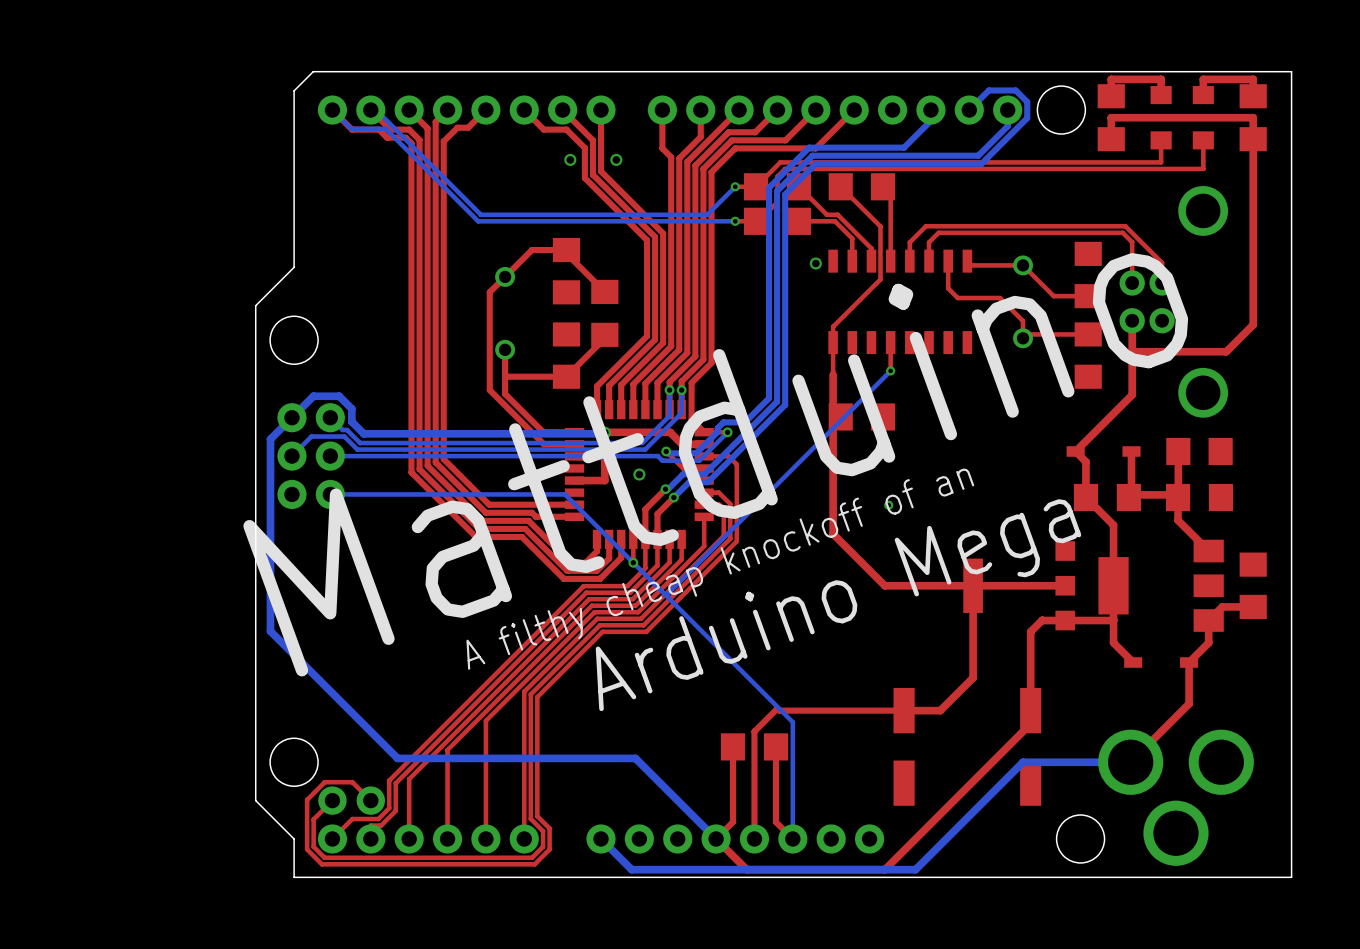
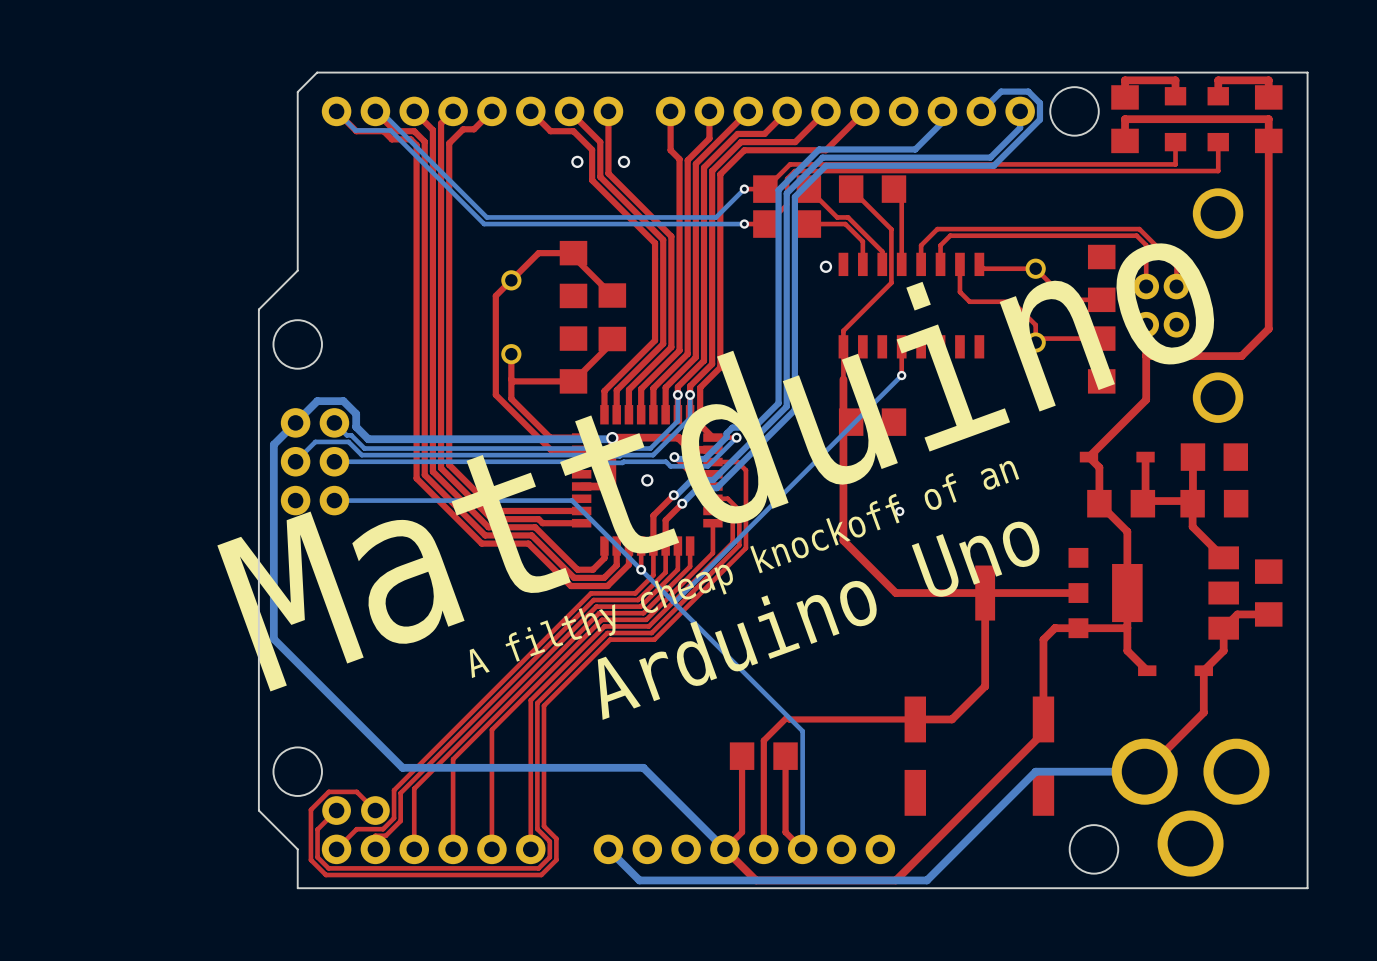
text: Arduino Mega (838, 605) -> Arduino Uno (819, 619)

